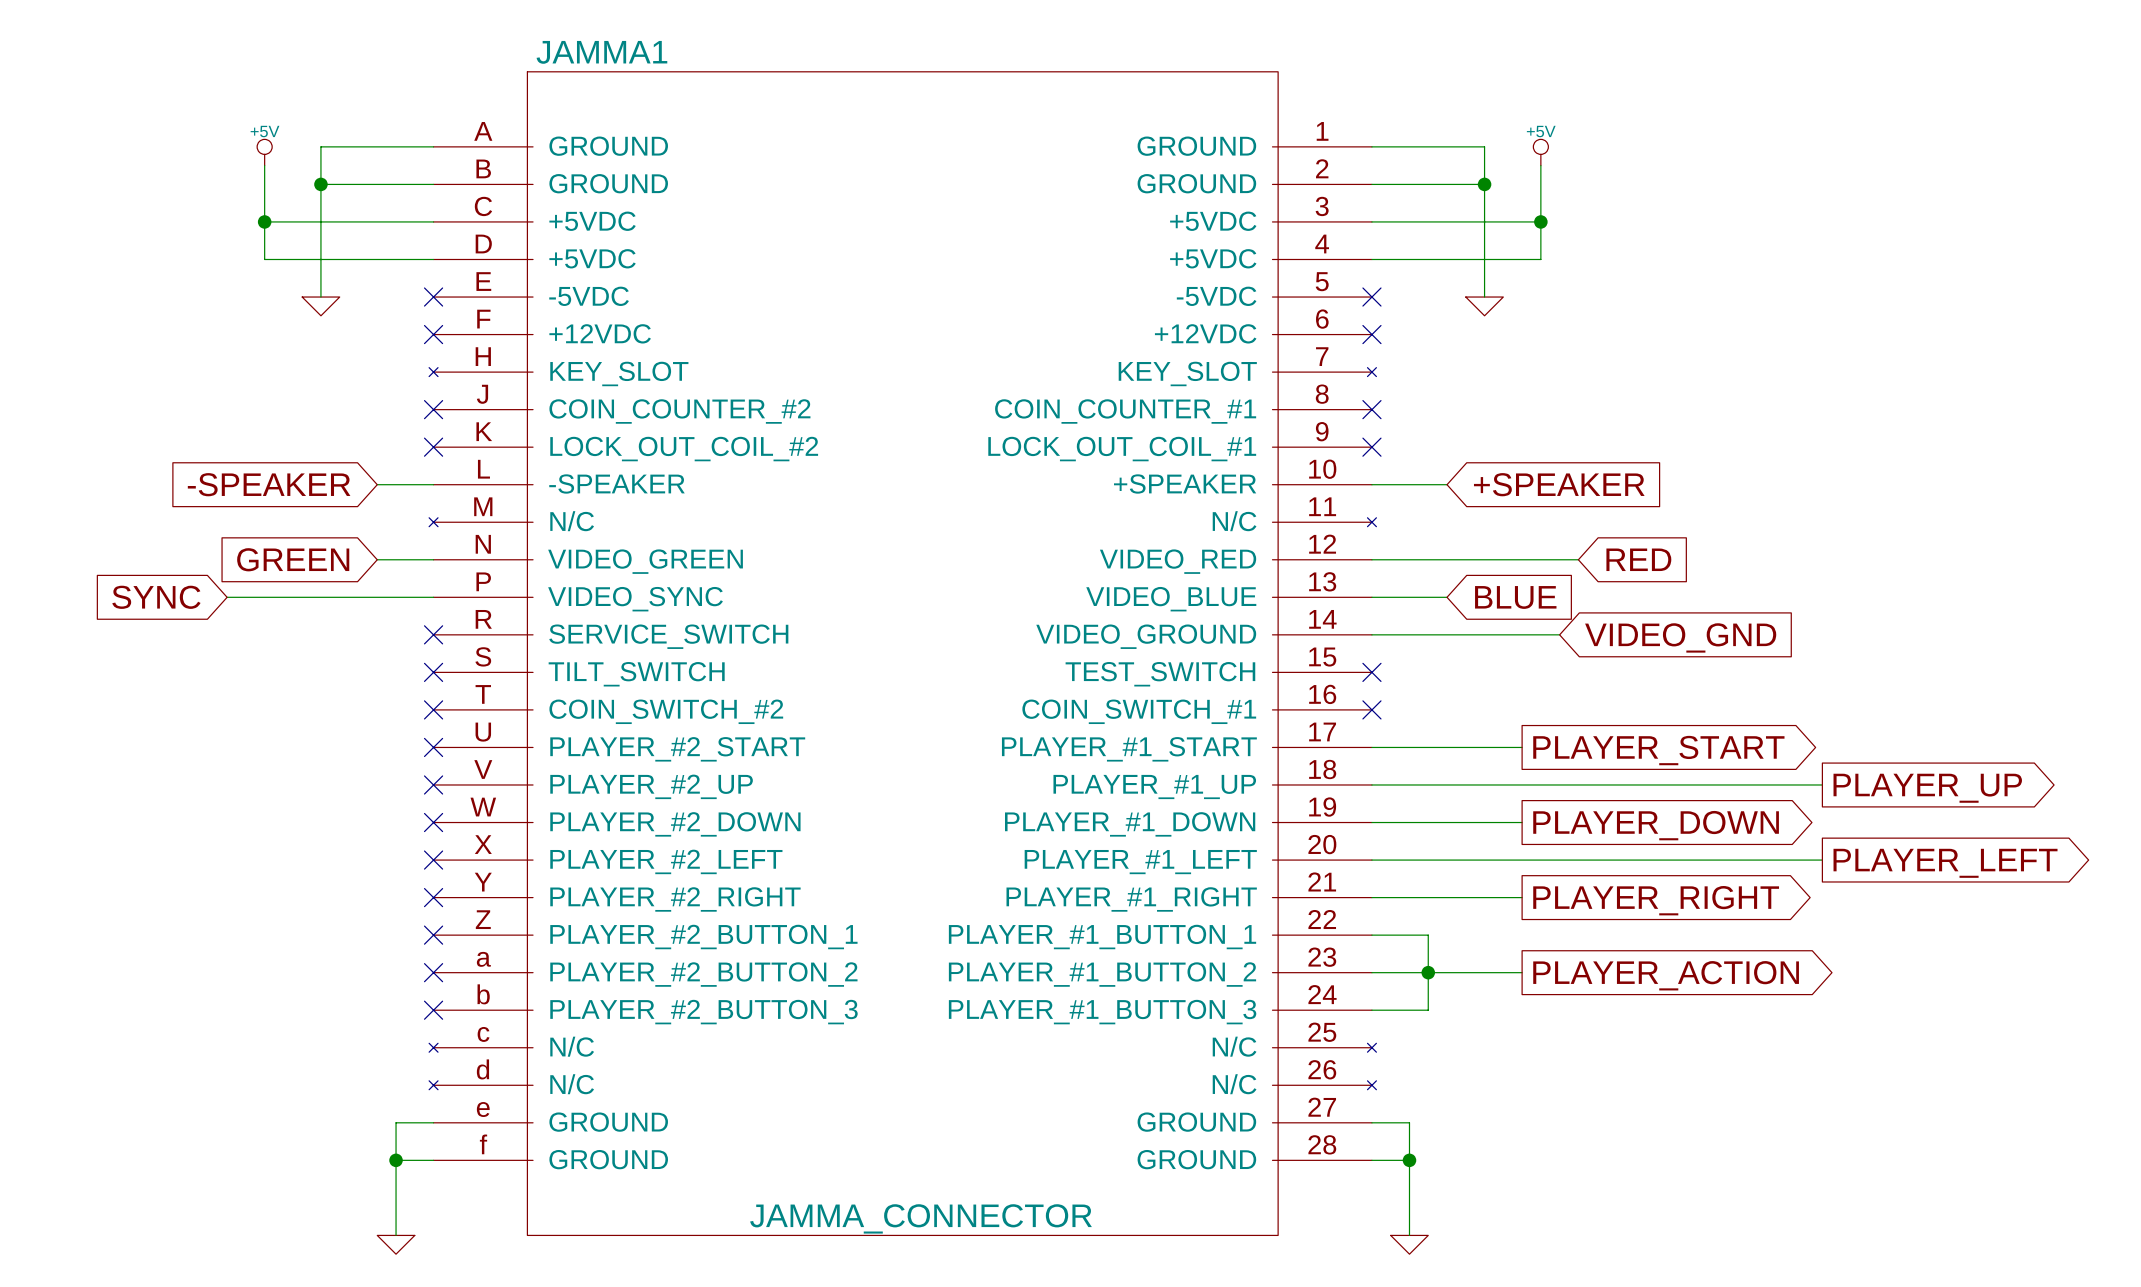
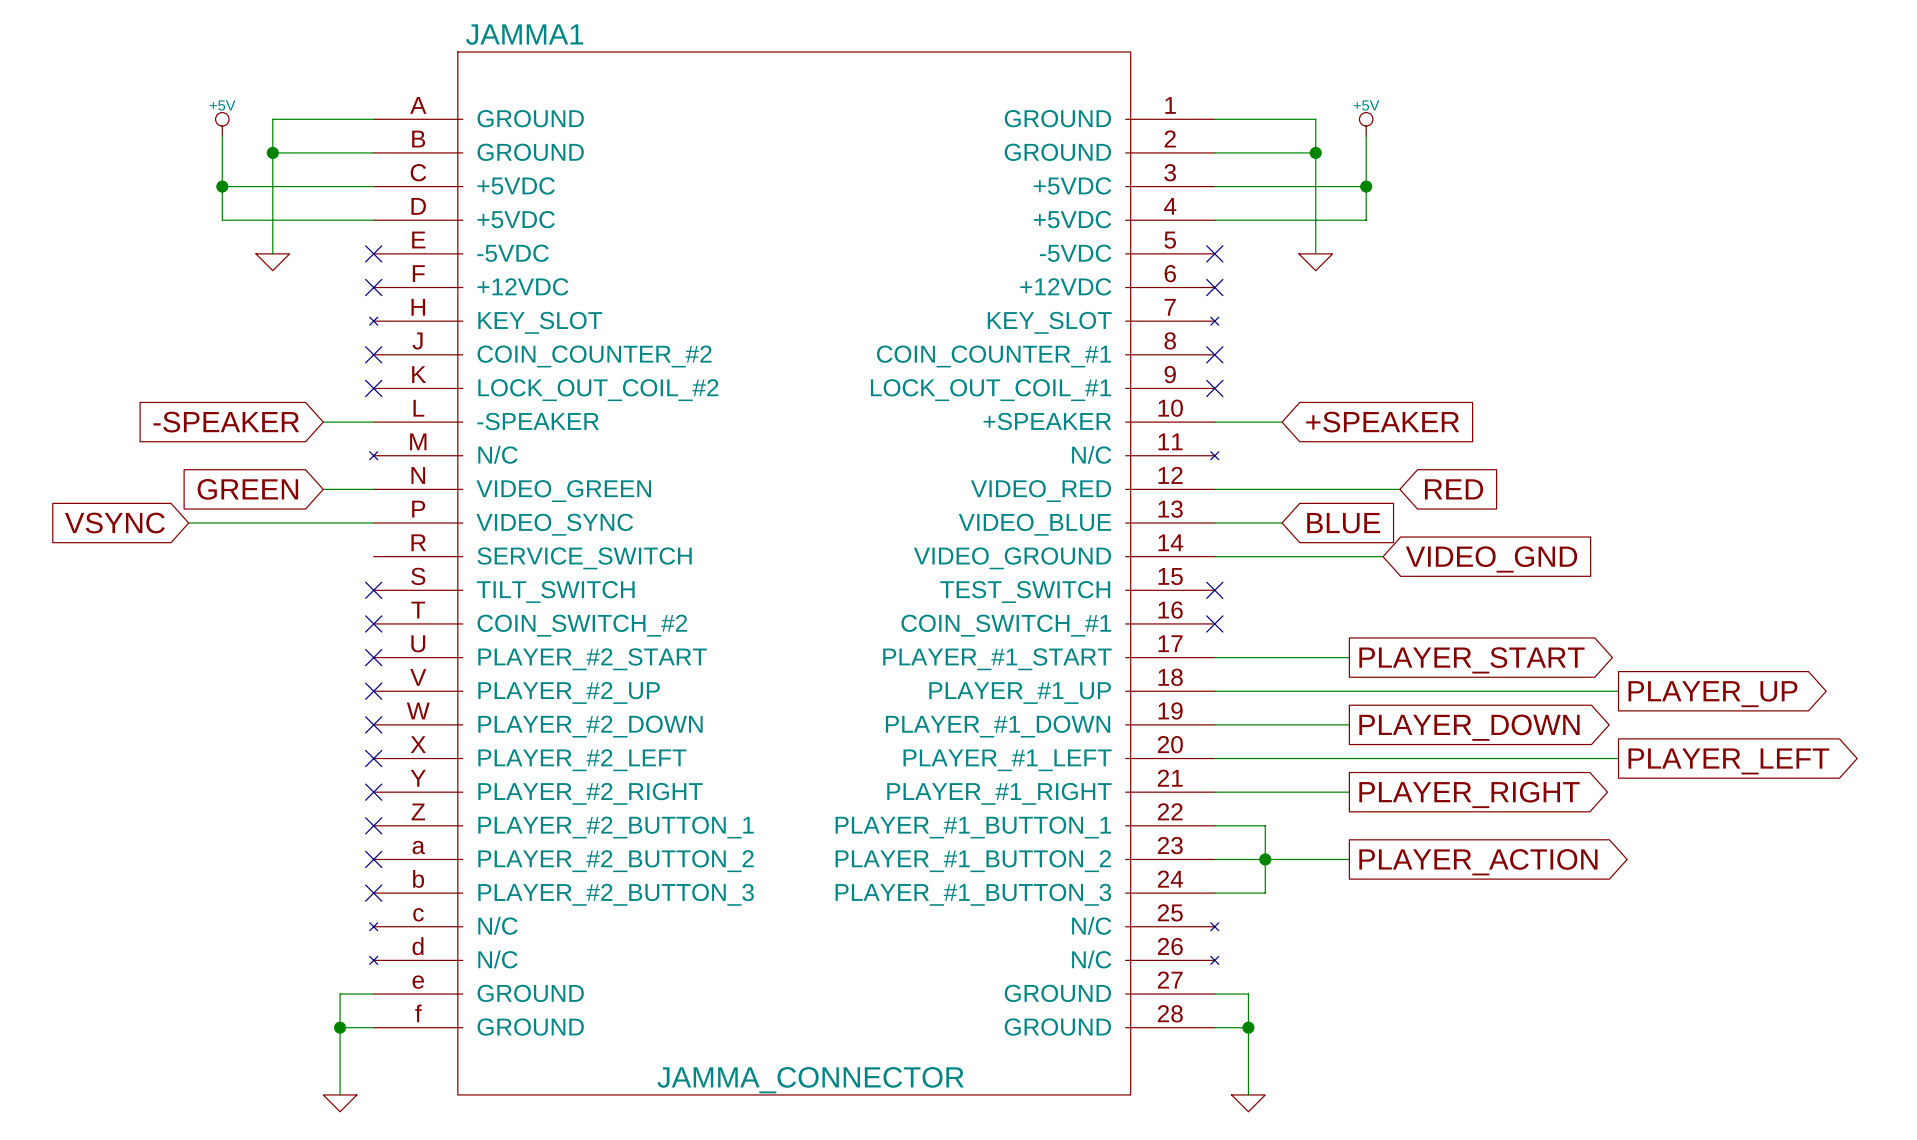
global label: SYNC (156, 597) -> VSYNC (114, 523)
no-connect mark: (433, 634) -> none

